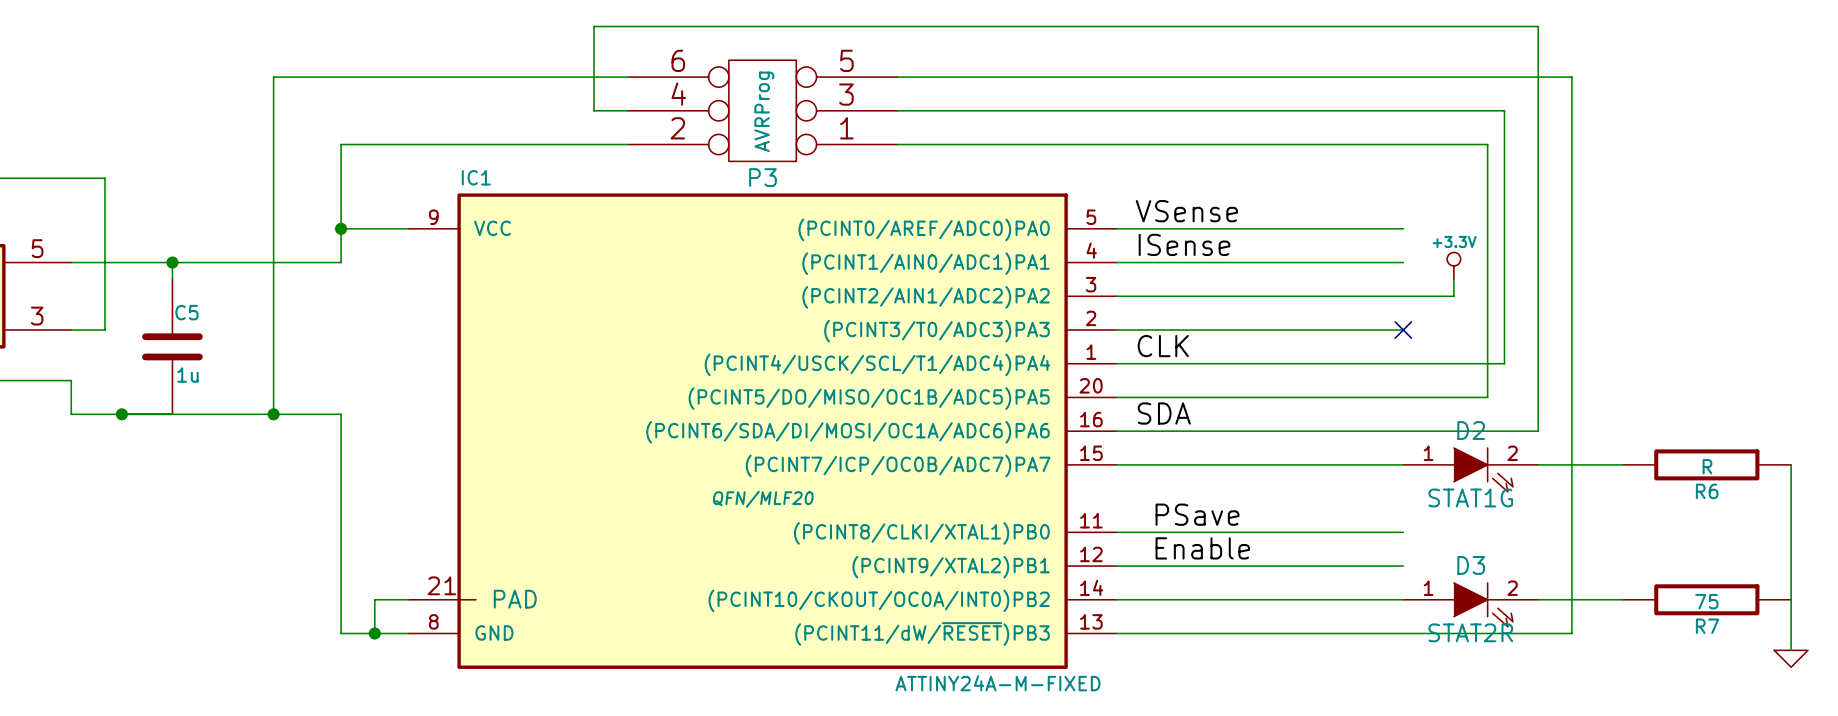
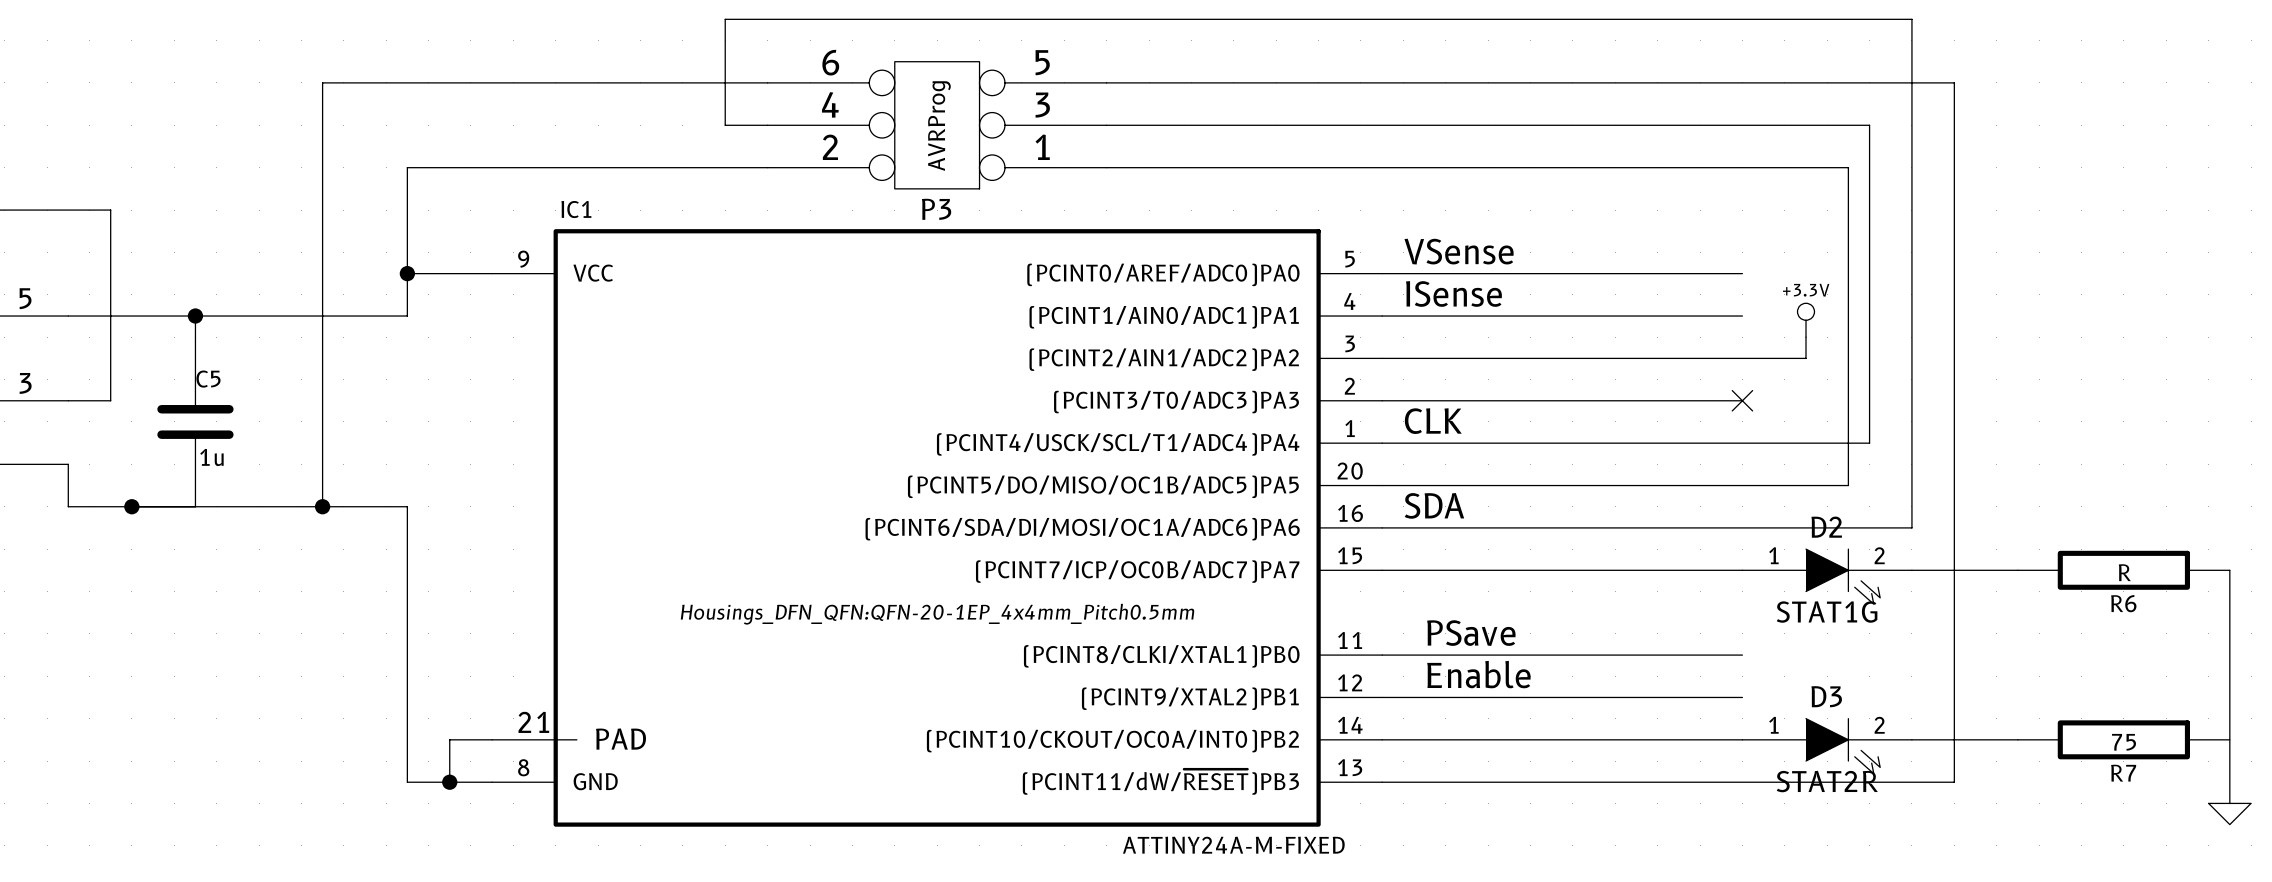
IC1 text: QFN/MLF20 (763, 499) -> Housings_DFN_QFN:QFN-20-1EP_4x4mm_Pitch0.5mm (937, 614)

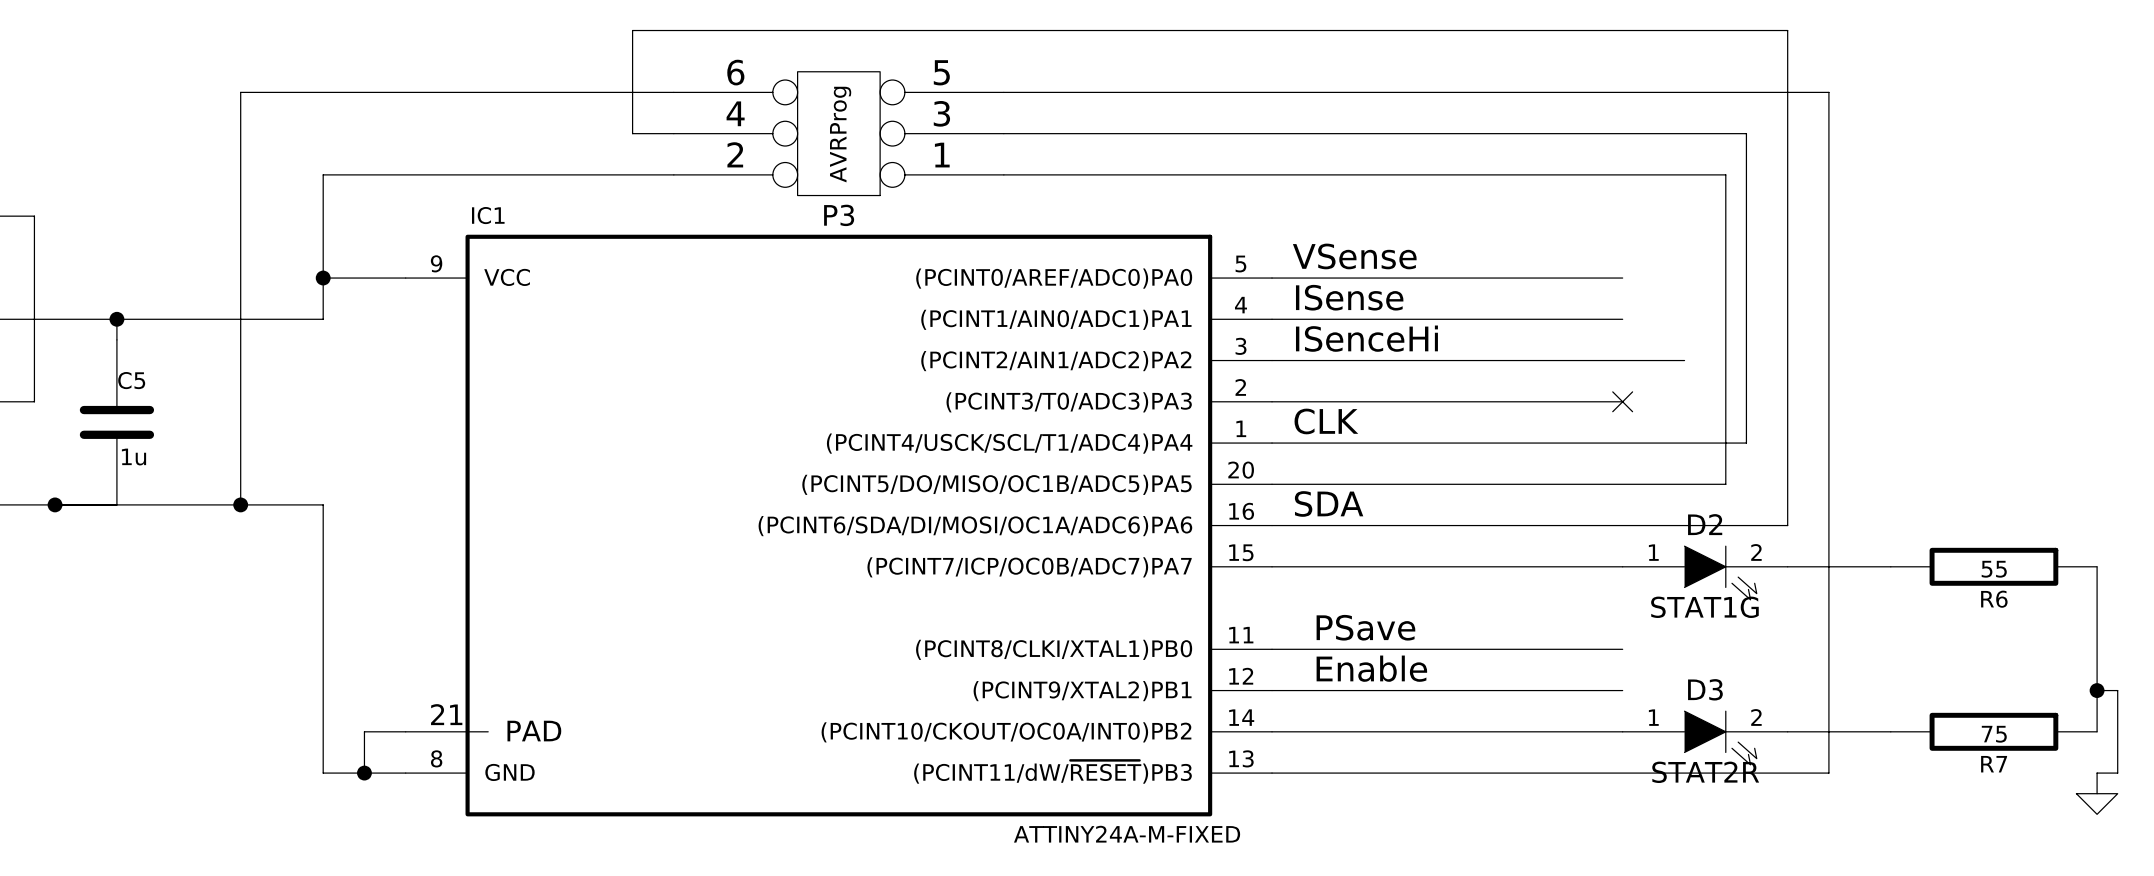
power symbol: +3.3V (1806, 320) -> none
label: none -> ISenceHi (1366, 338)
wire: (1806, 337) (1806, 358) -> none
R6 value: R (2124, 572) -> 55 (1994, 569)
IC1 text: Housings_DFN_QFN:QFN-20-1EP_4x4mm_Pitch0.5mm (937, 614) -> none
junction: none -> (2097, 690)
wire: (2229, 739) (2229, 782) -> (2097, 690) (2117, 690) (2117, 773) (2097, 773)

